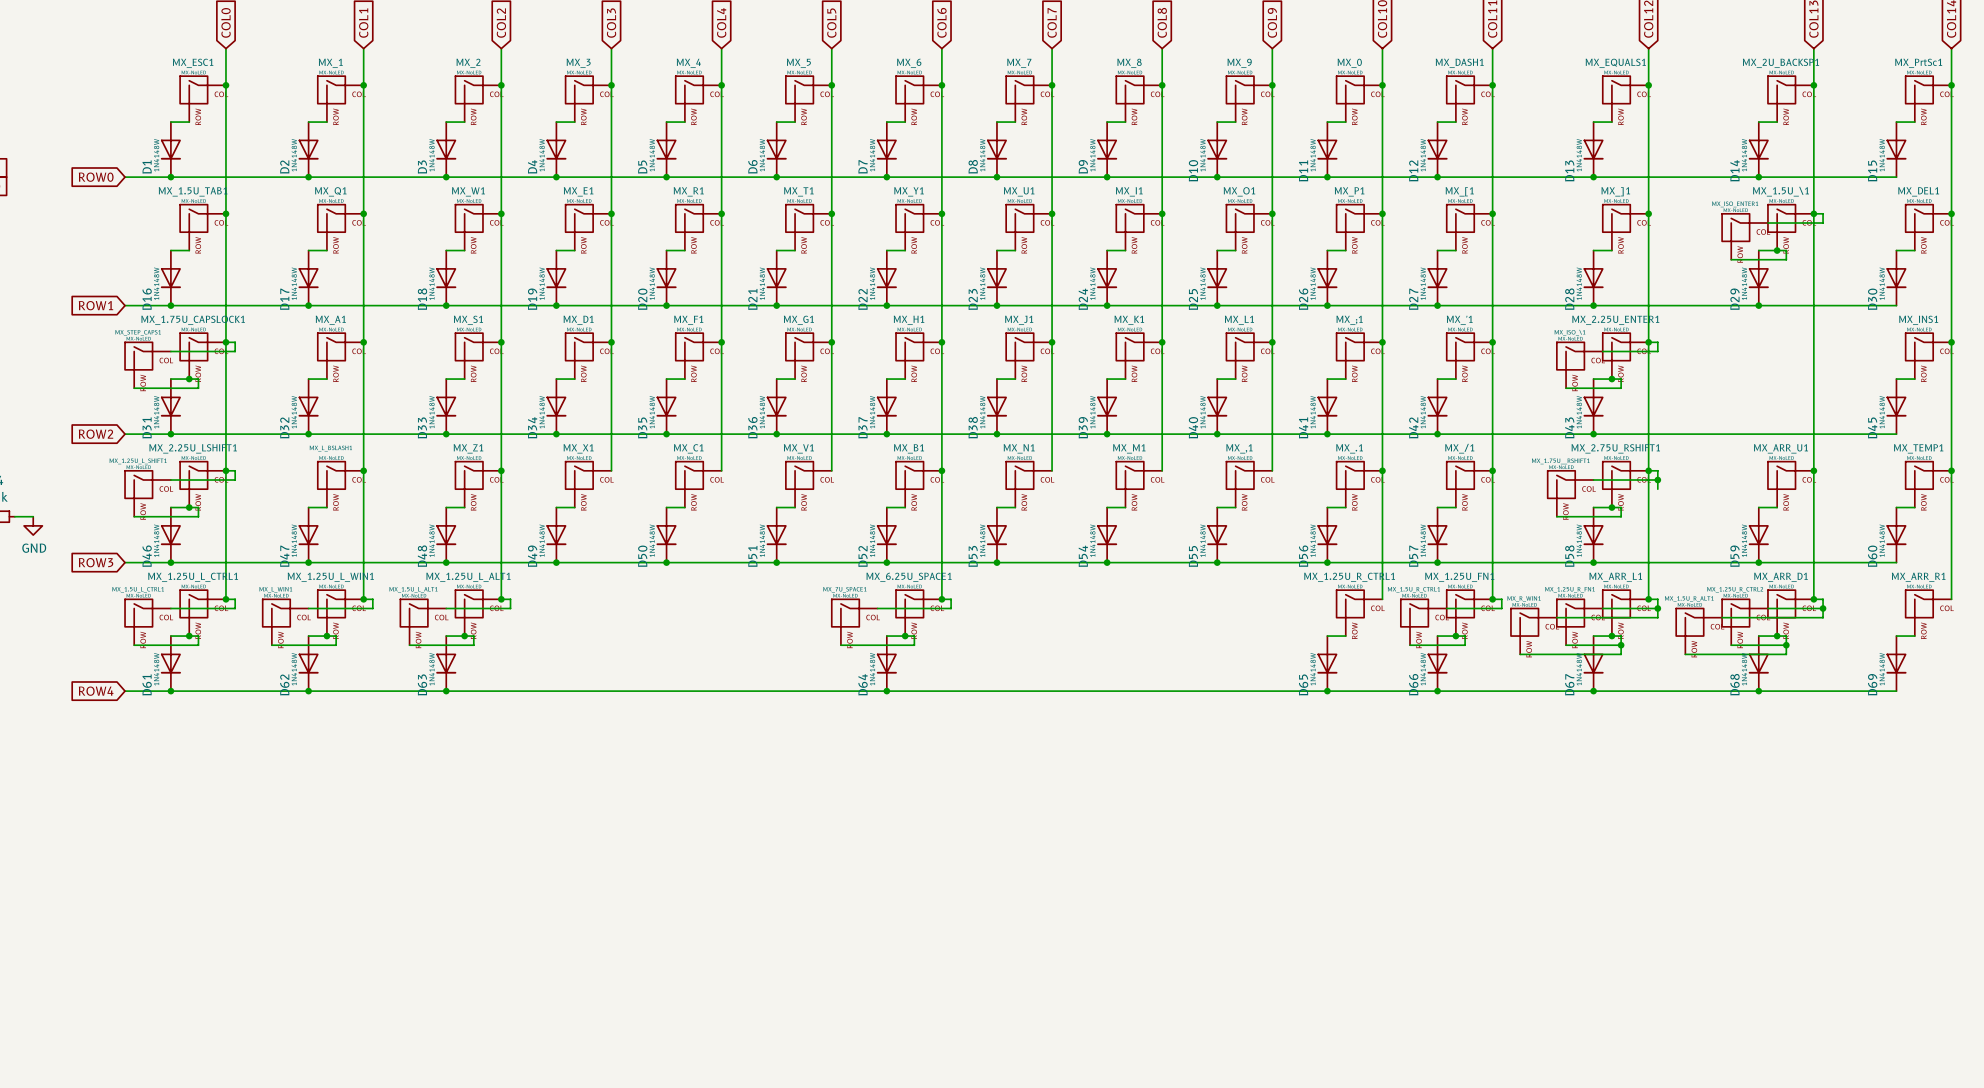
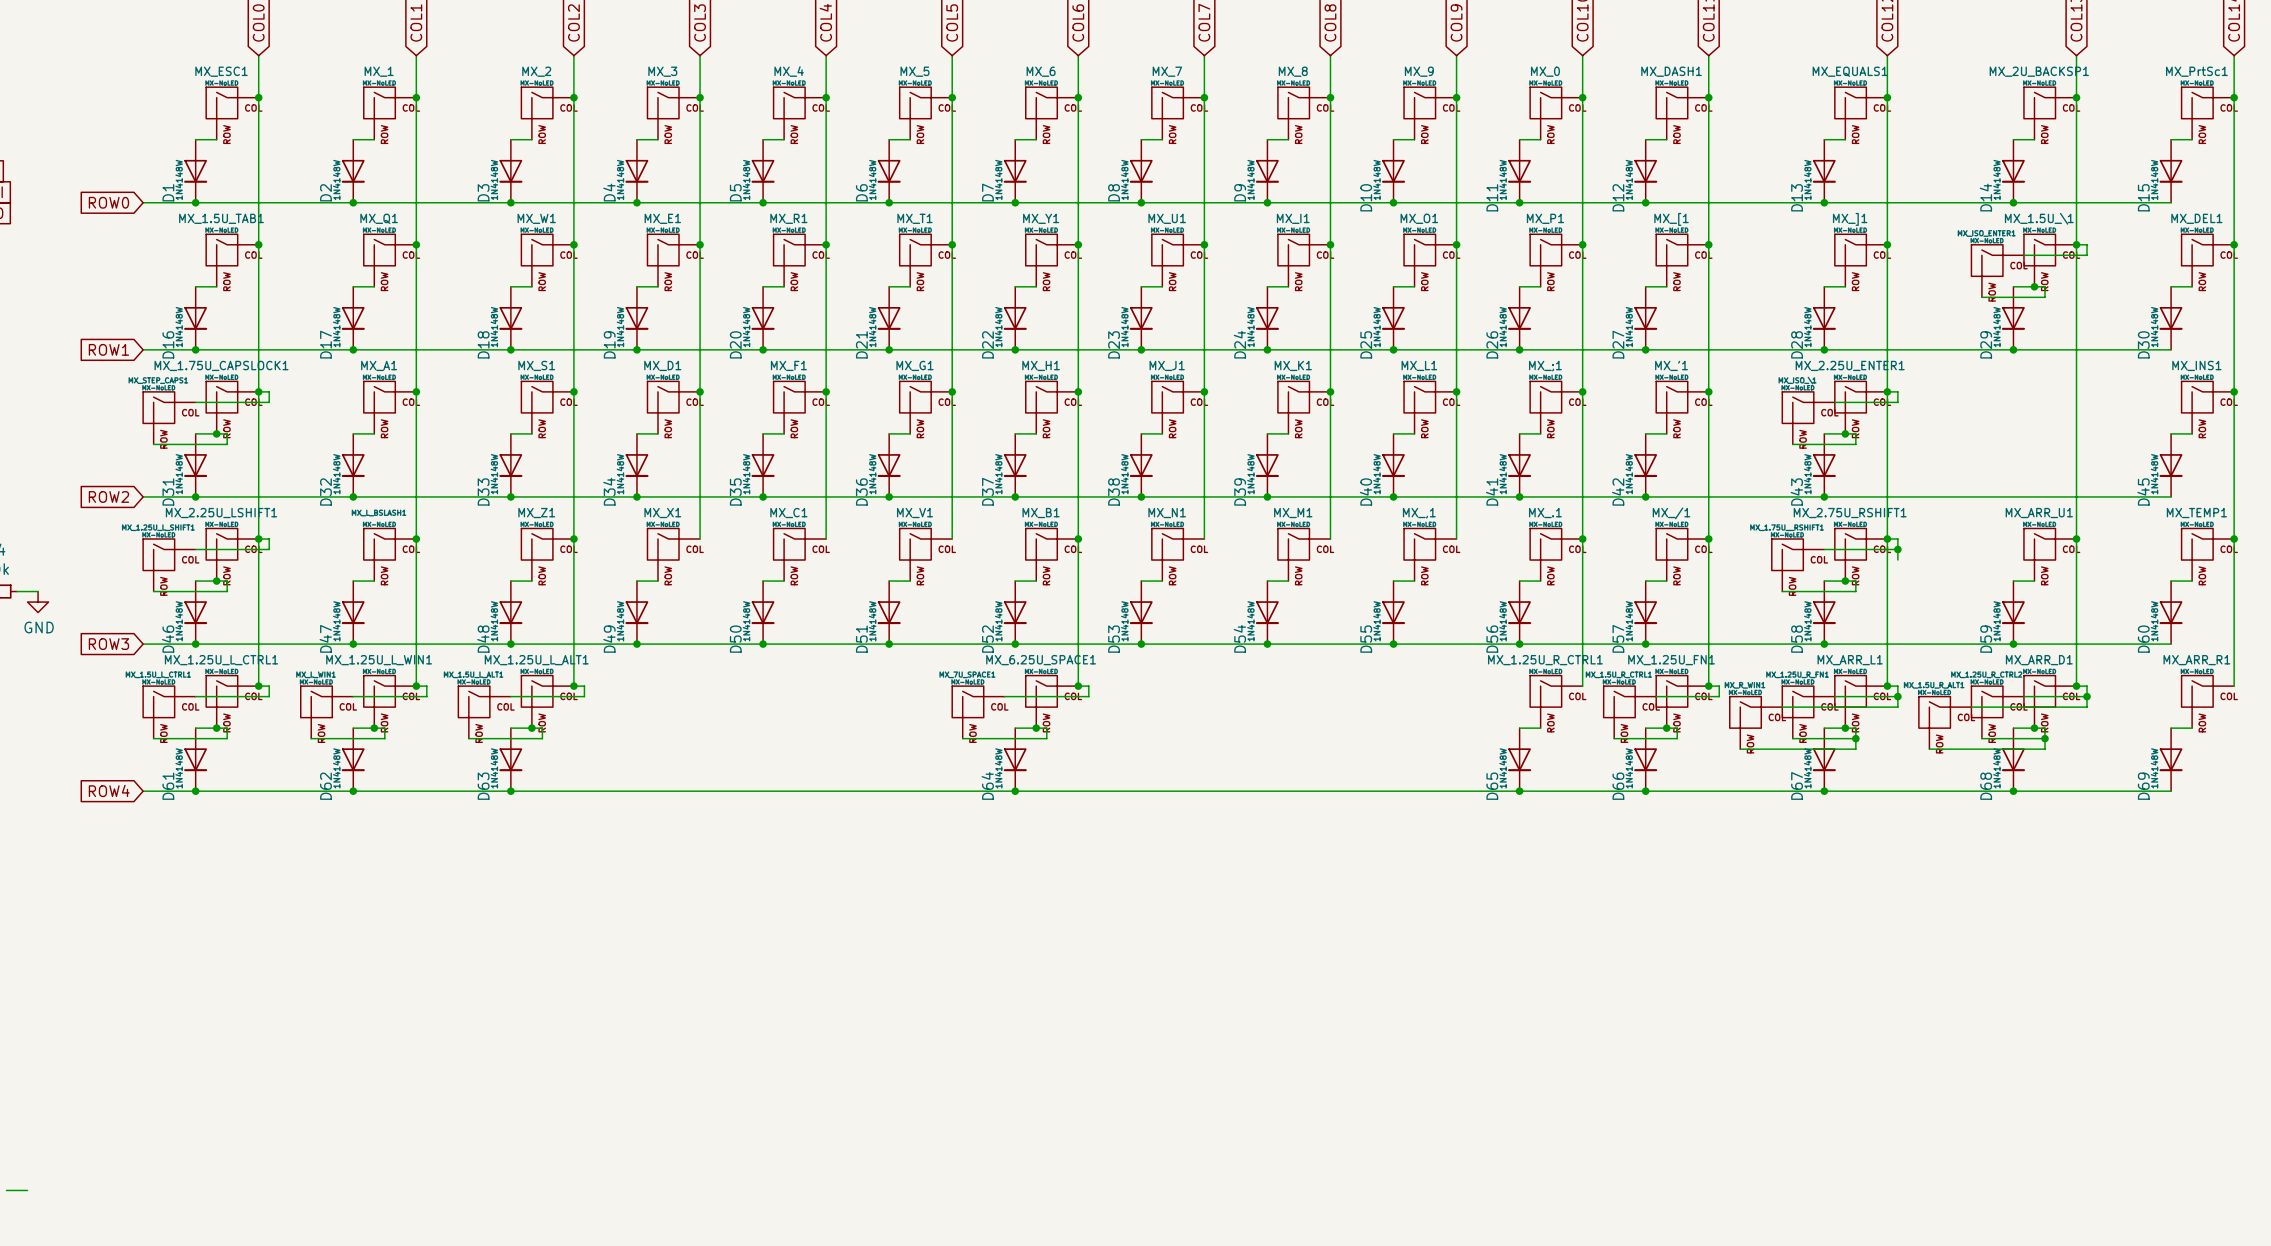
wire: none -> (6, 1190) (27, 1190)

